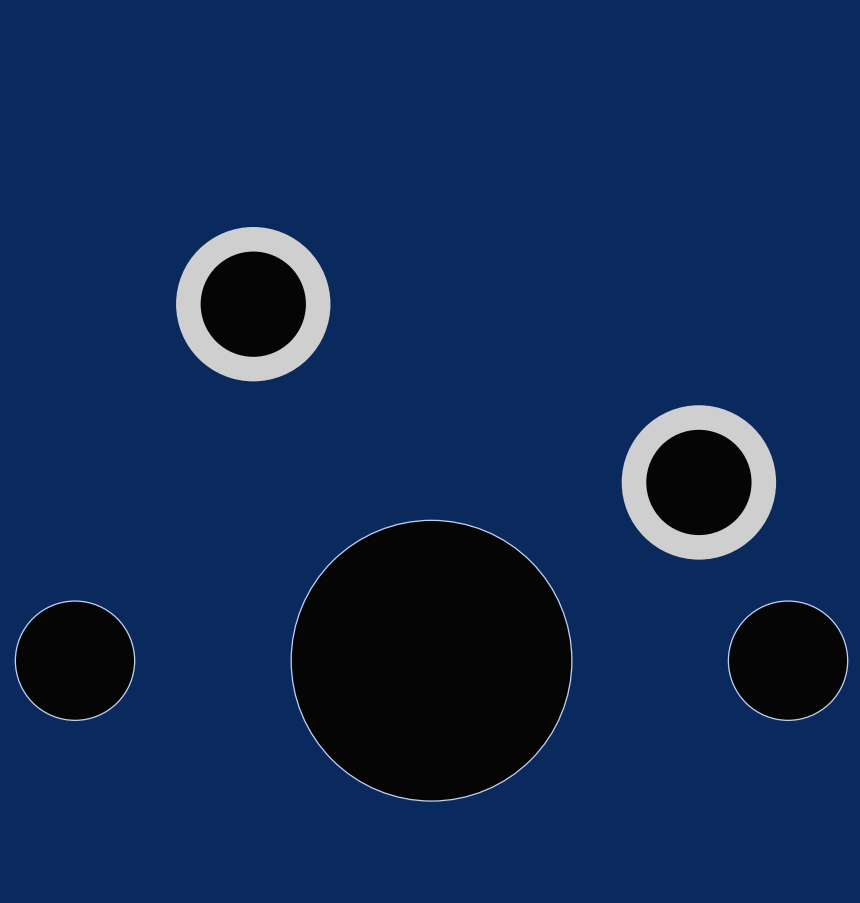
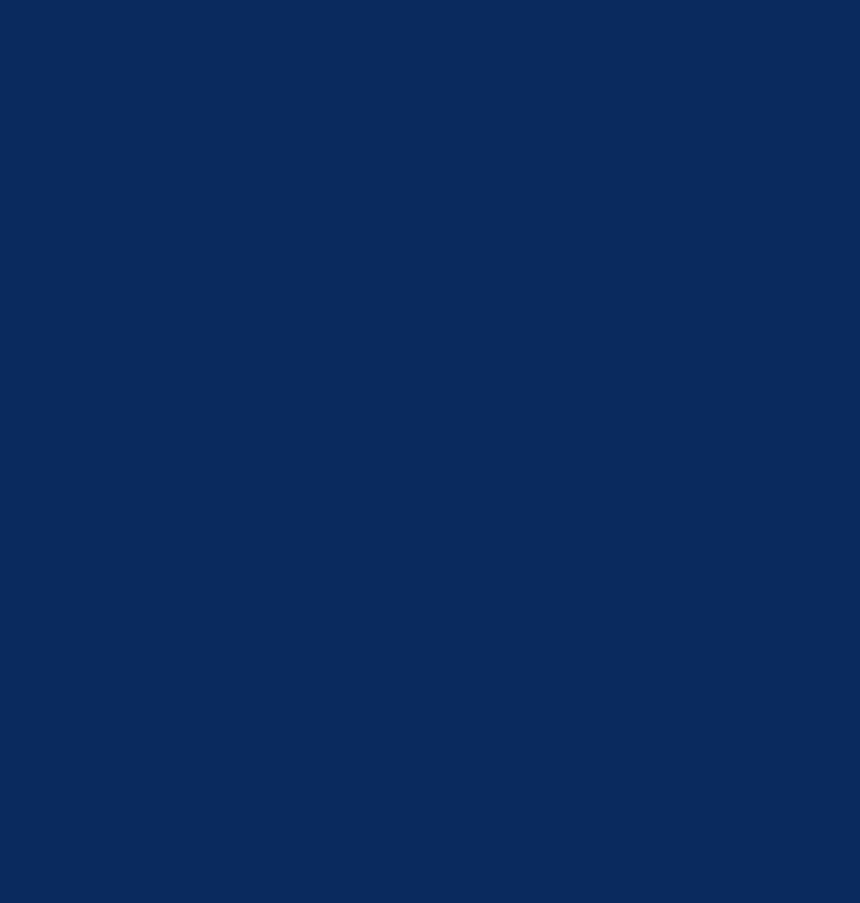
part: (431, 514) -> none

